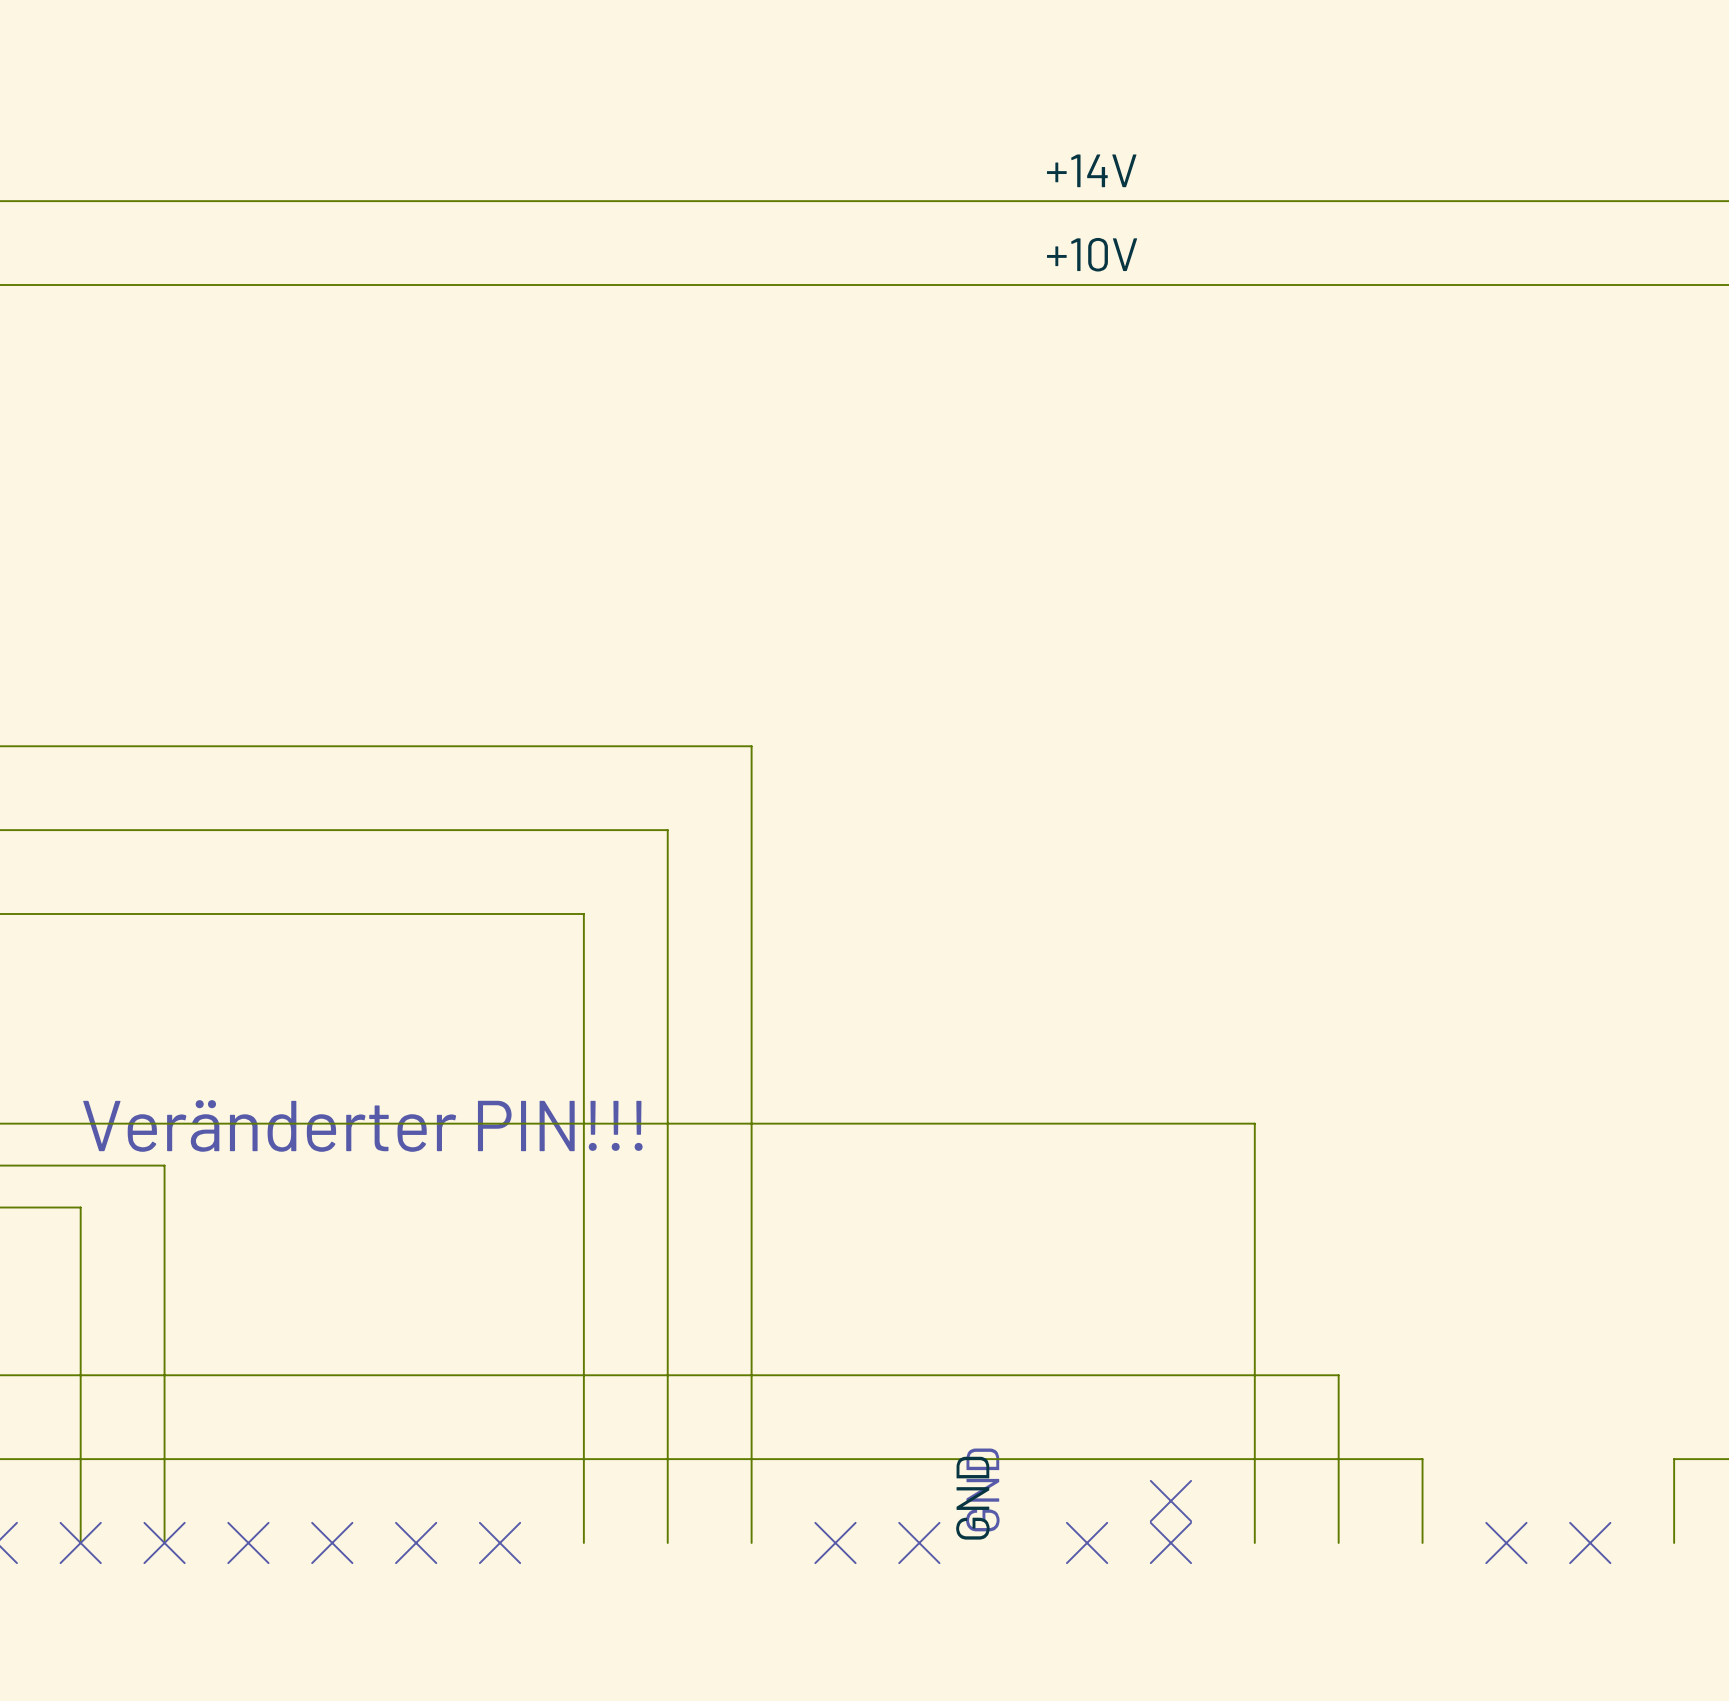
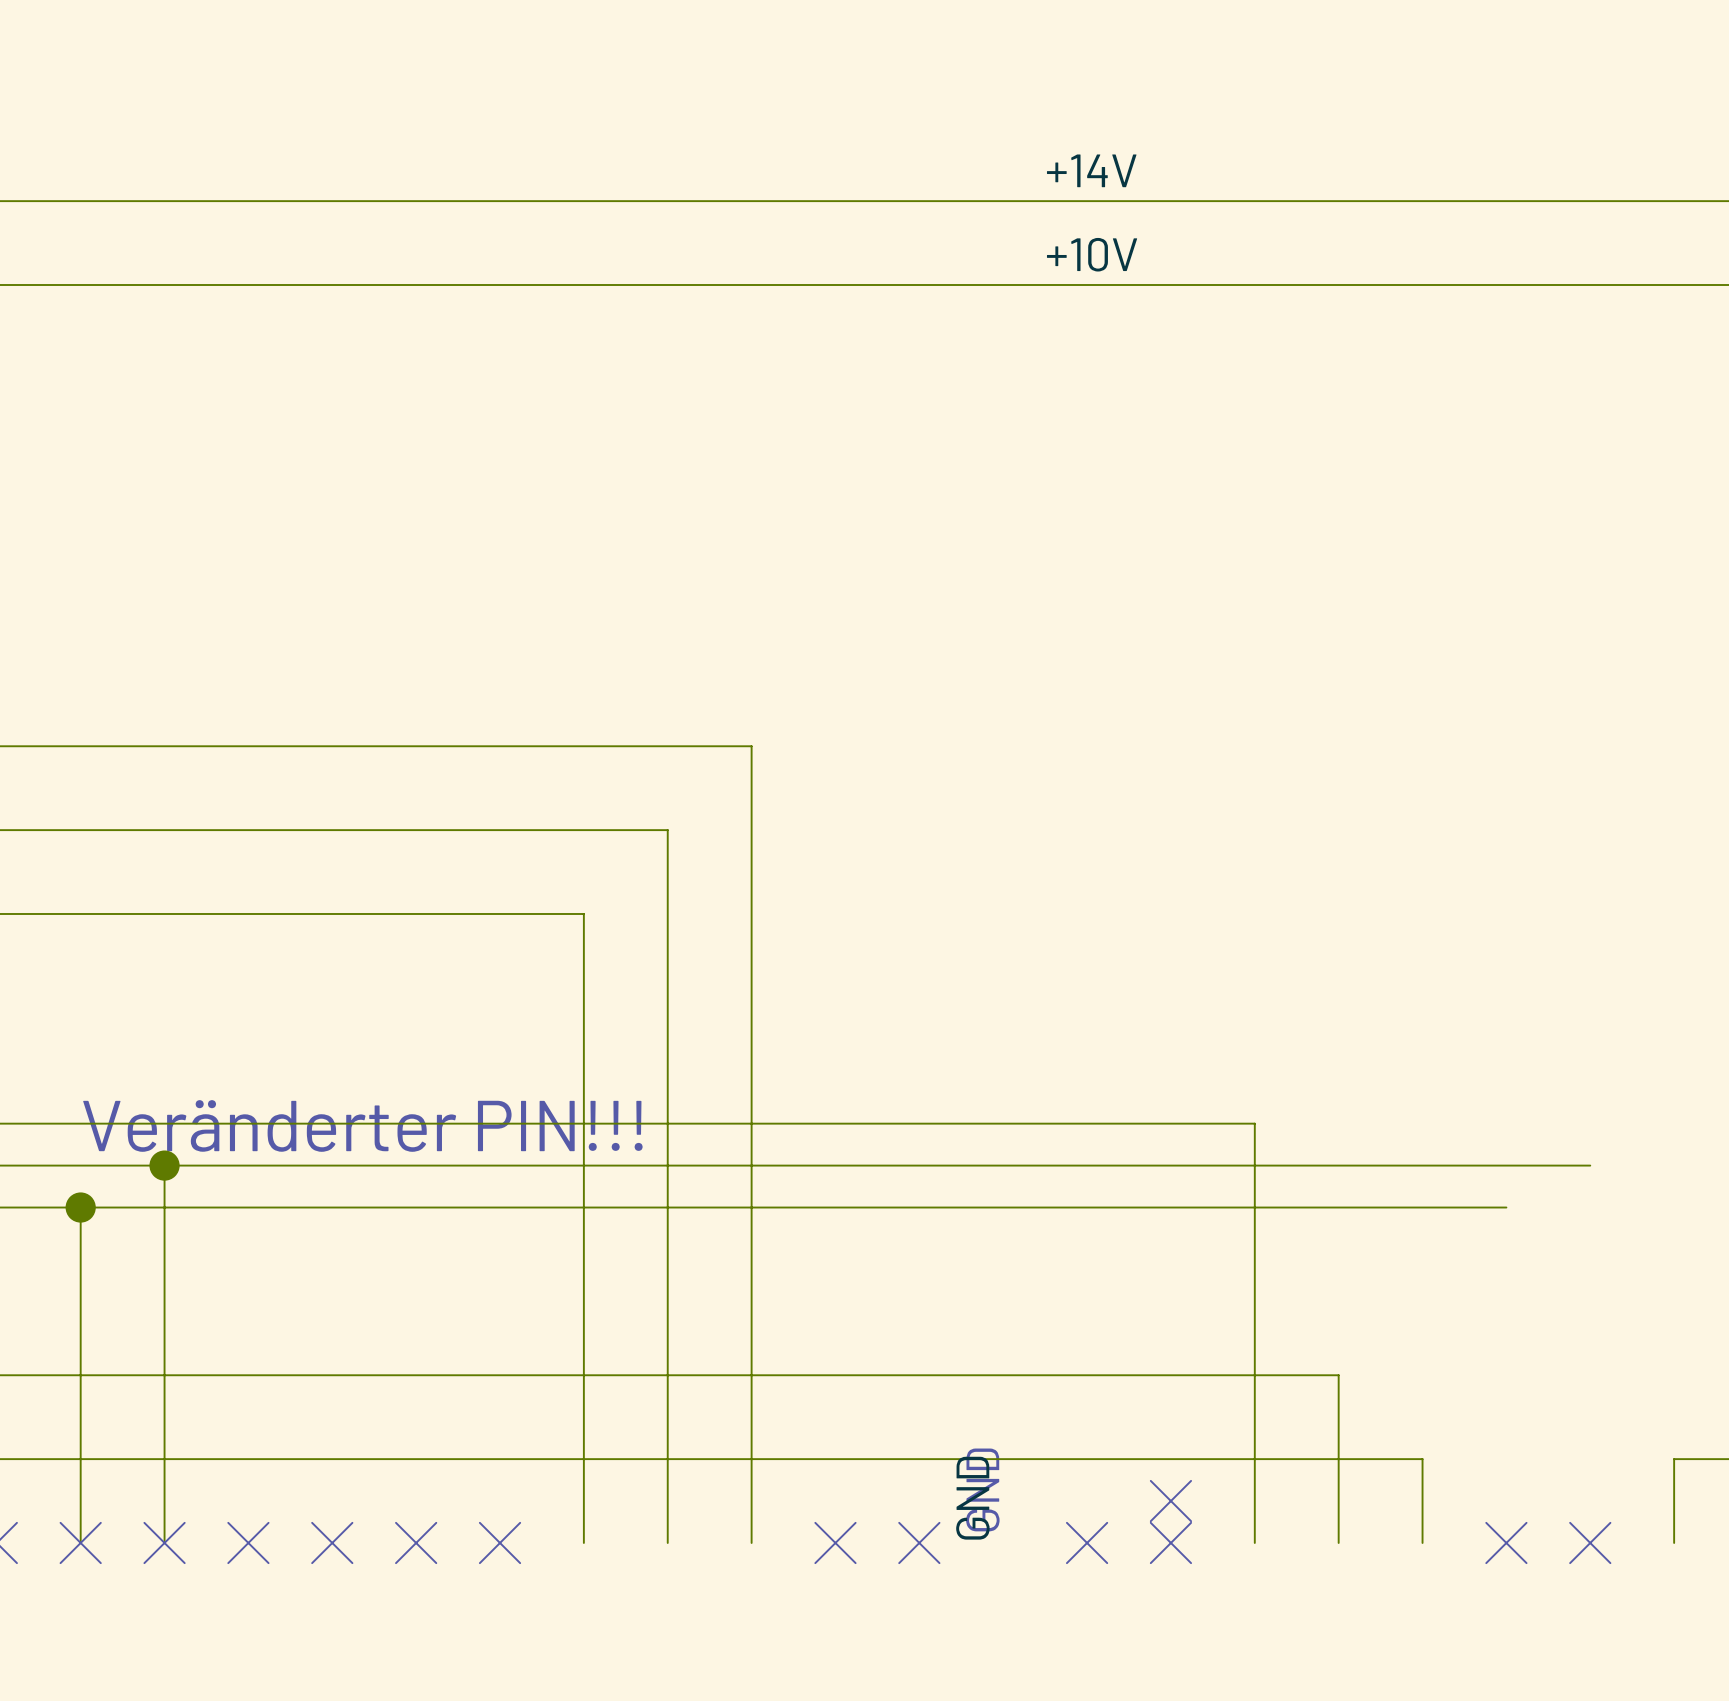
wire: none -> (164, 1165) (1590, 1165)
junction: none -> (164, 1165)
wire: none -> (80, 1207) (1506, 1207)
junction: none -> (80, 1207)

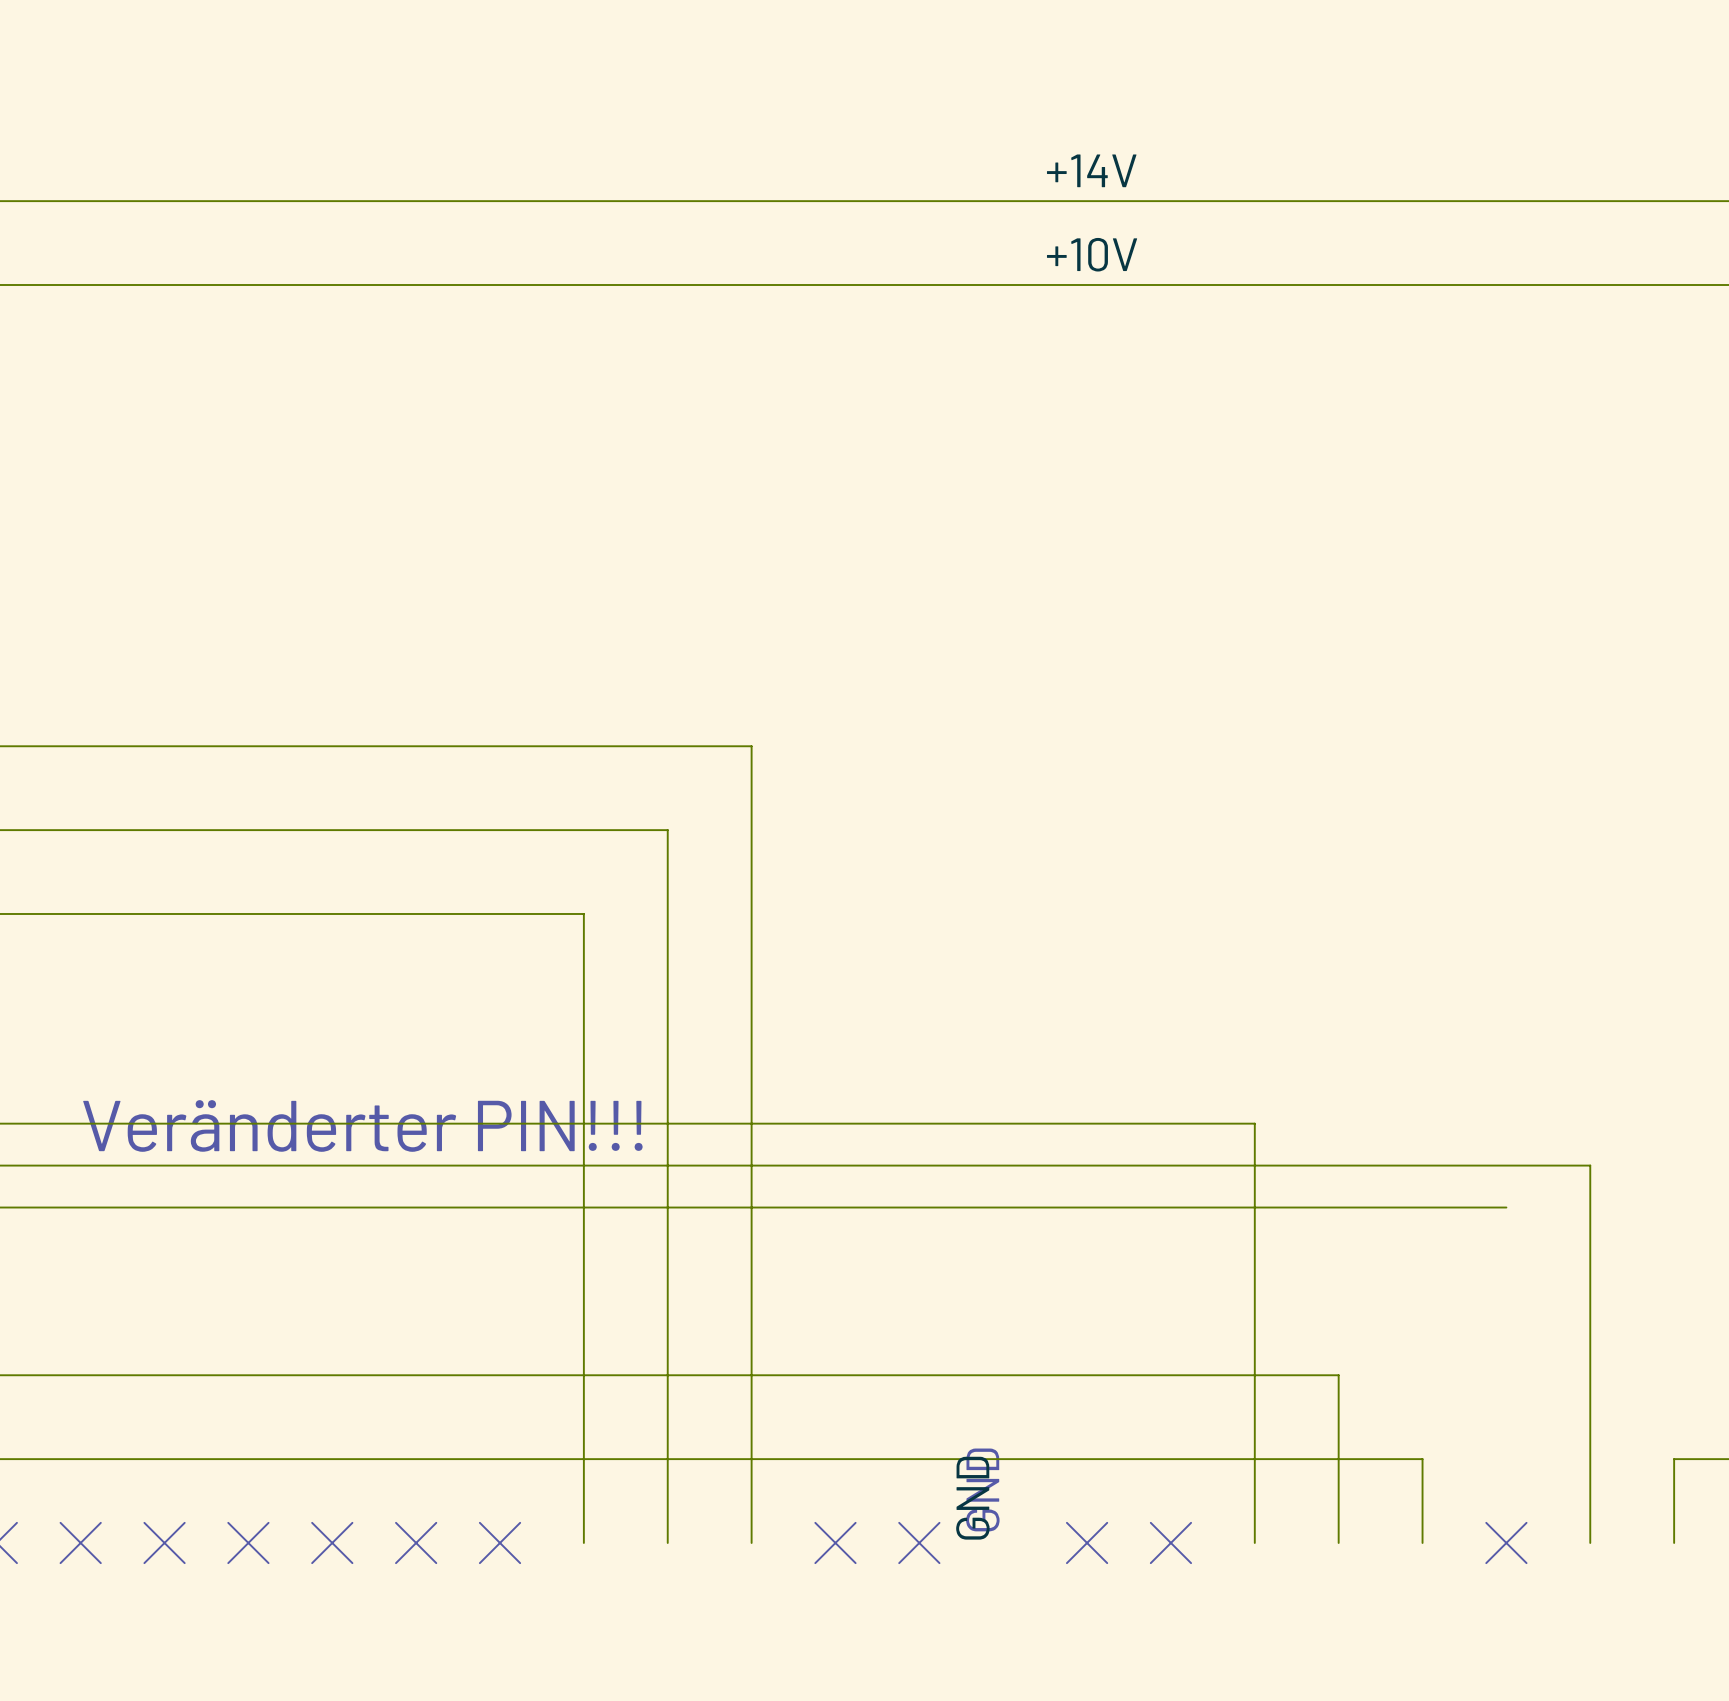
wire: (164, 1165) (164, 1542) -> none
junction: (164, 1165) -> none
wire: none -> (1590, 1165) (1590, 1542)
wire: (80, 1207) (80, 1542) -> none
junction: (80, 1207) -> none
no-connect mark: (1170, 1501) -> none
no-connect mark: (1590, 1542) -> none

